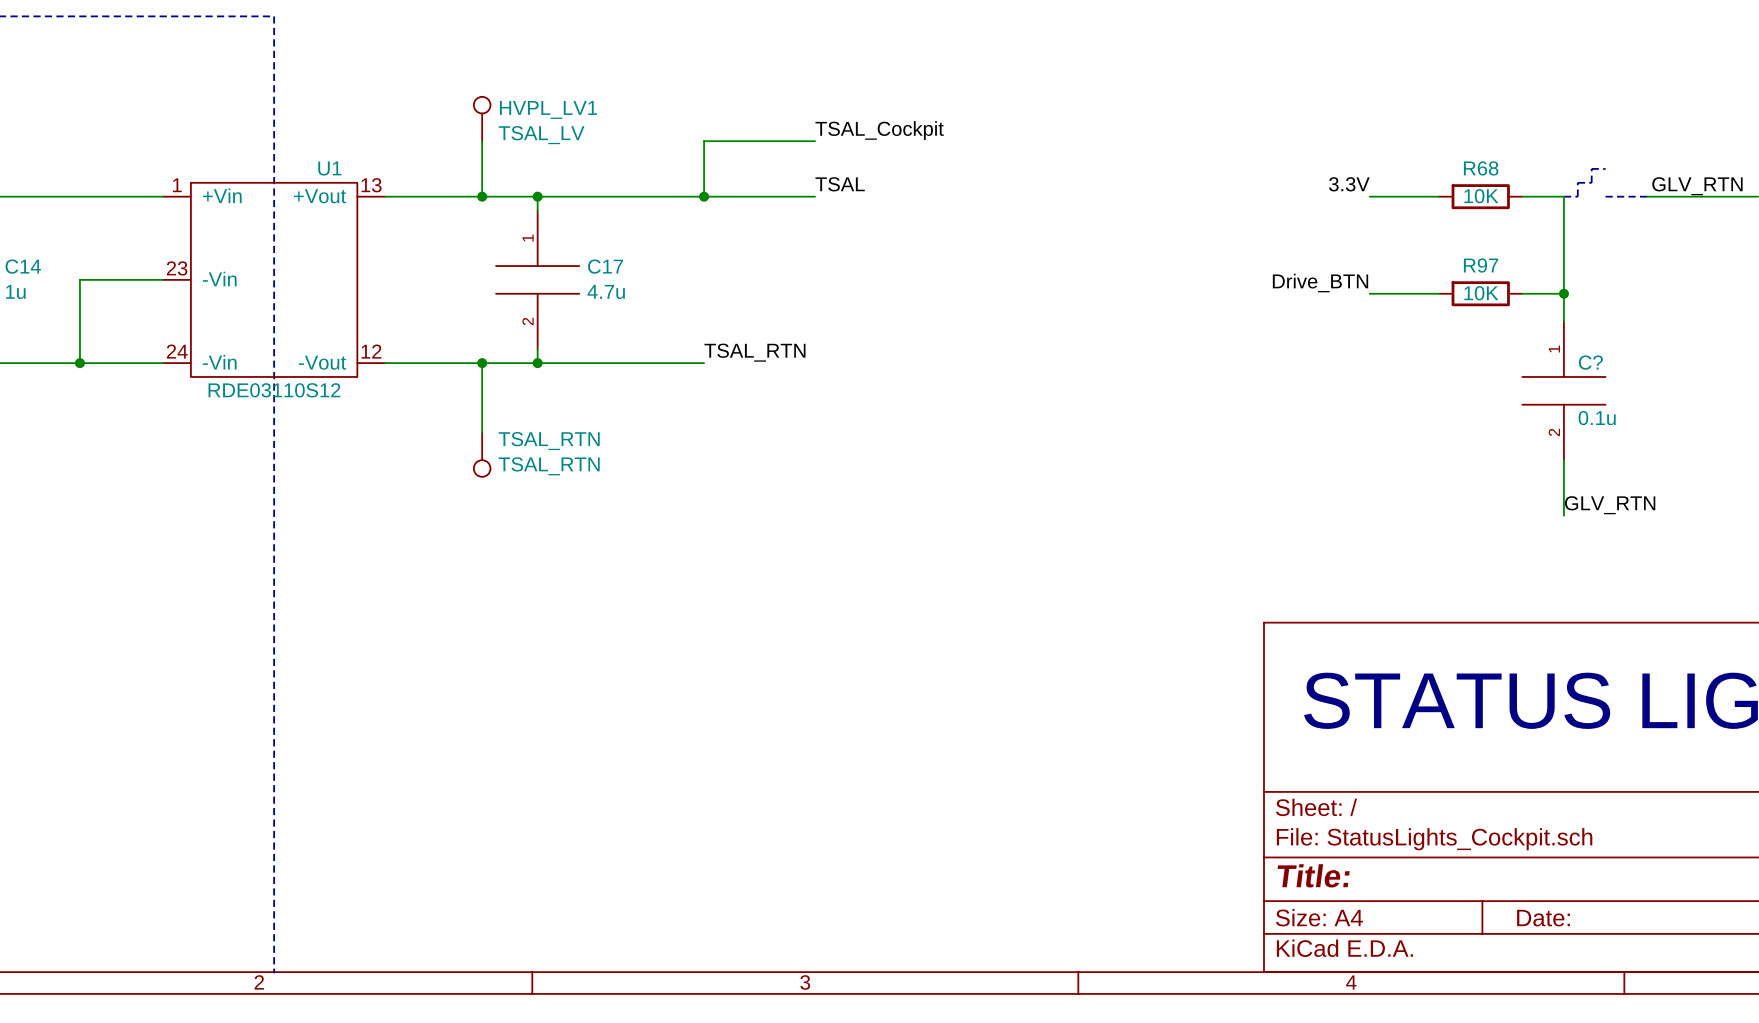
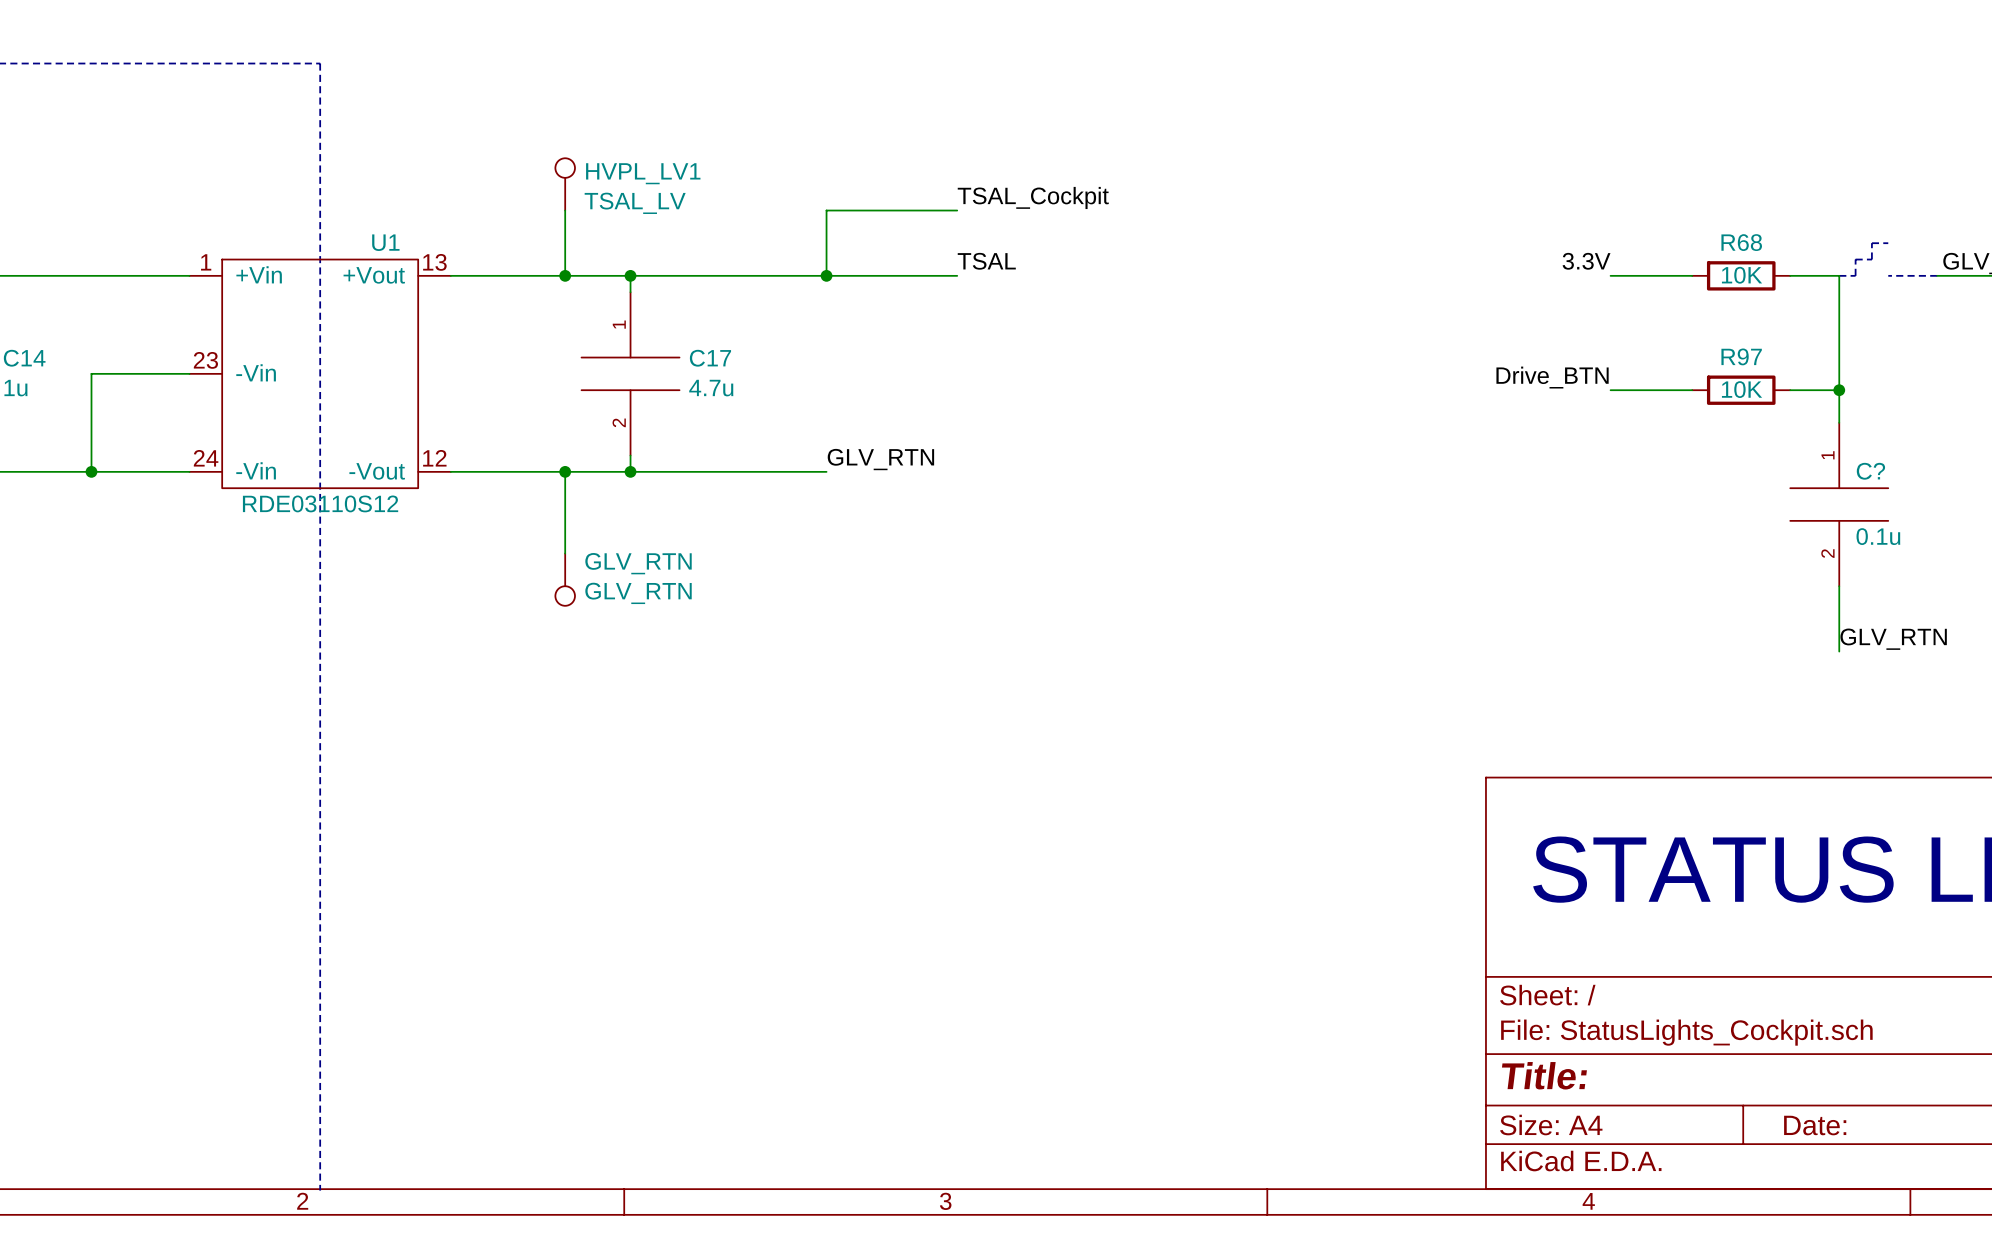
label: TSAL_RTN (755, 352) -> GLV_RTN (880, 459)
TSAL_RTN name: TSAL_RTN (549, 441) -> GLV_RTN (638, 563)
TSAL_RTN value: TSAL_RTN (549, 466) -> GLV_RTN (638, 593)

